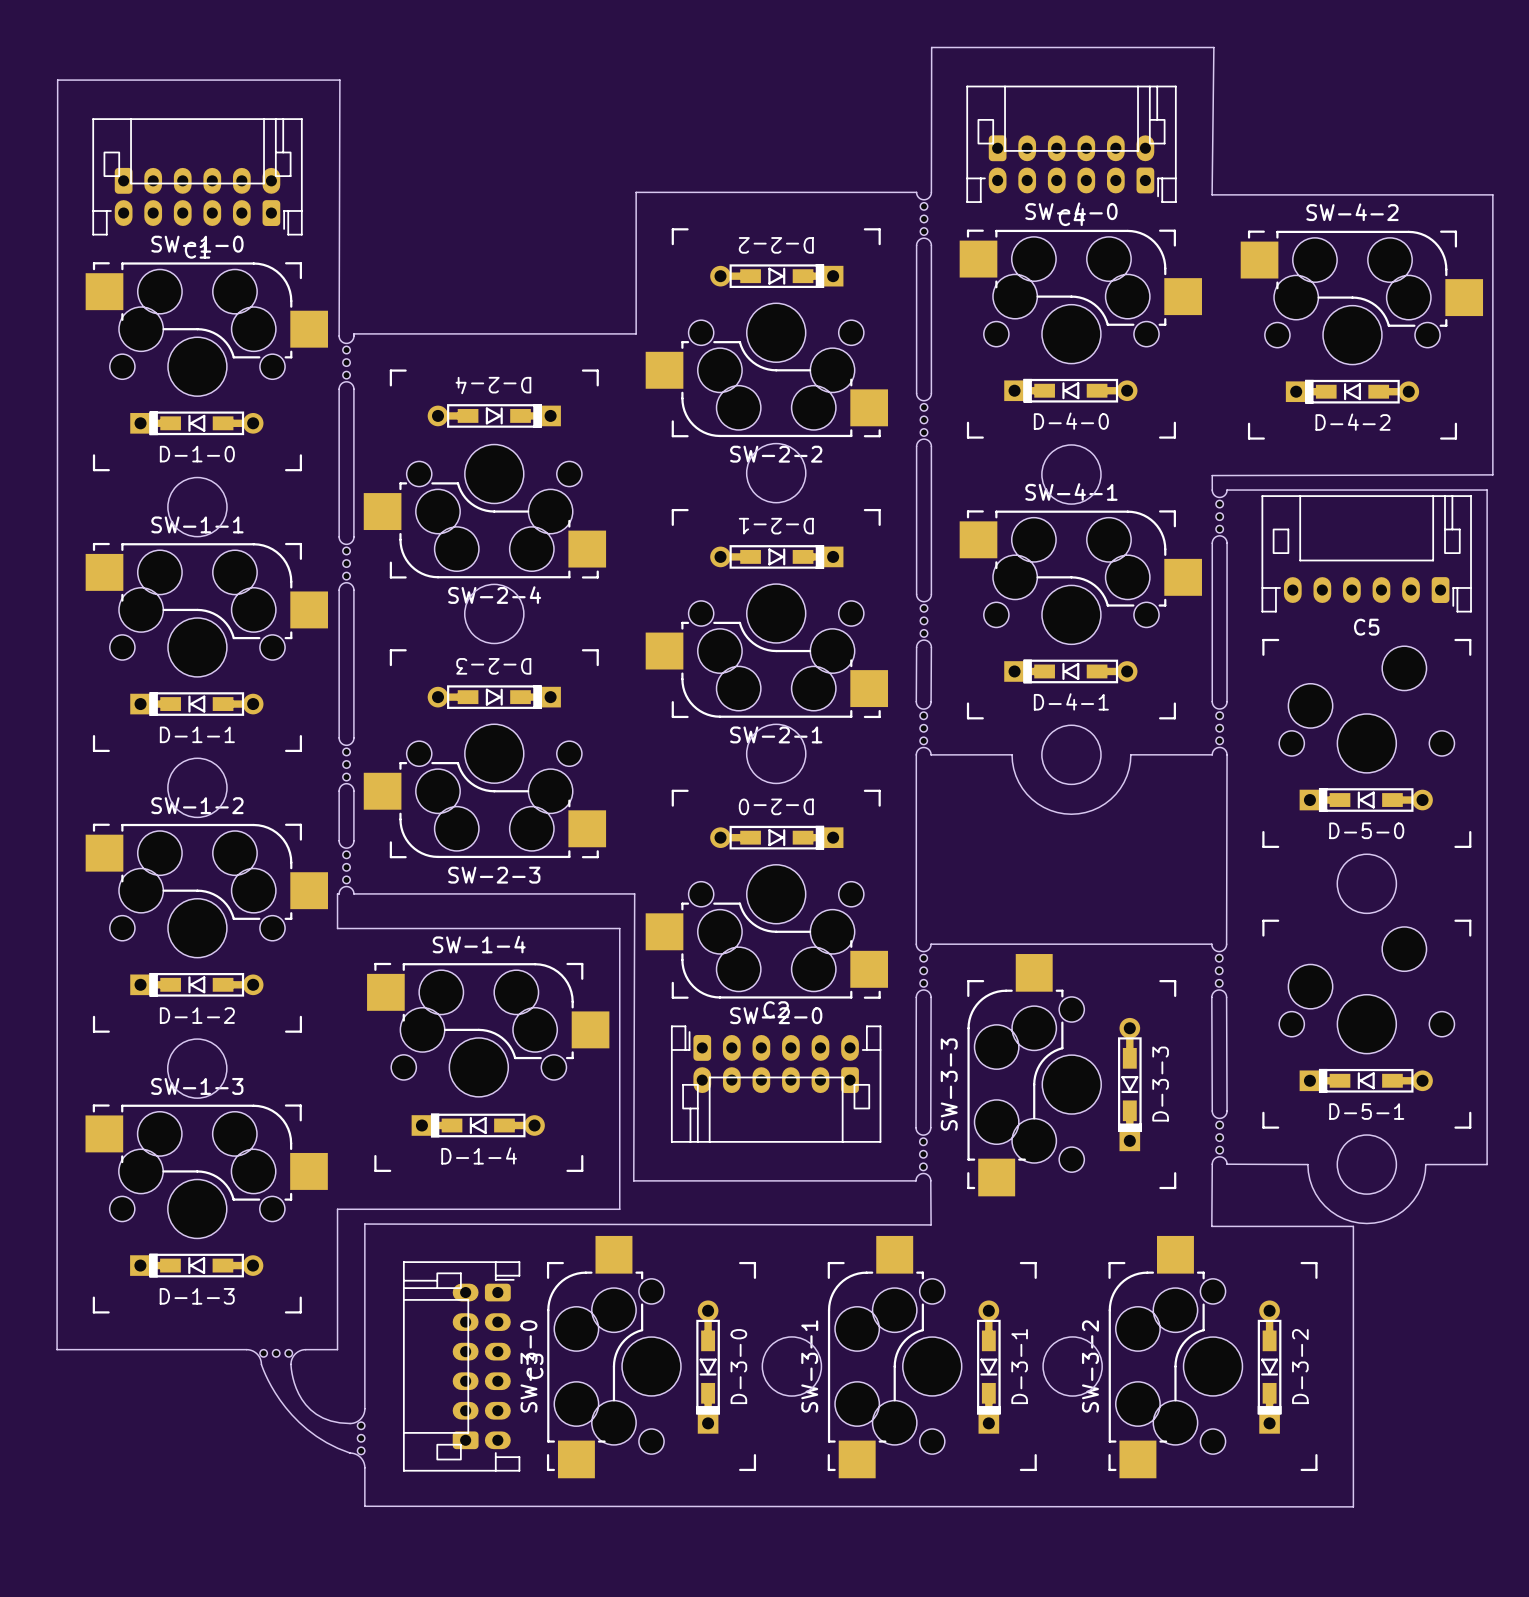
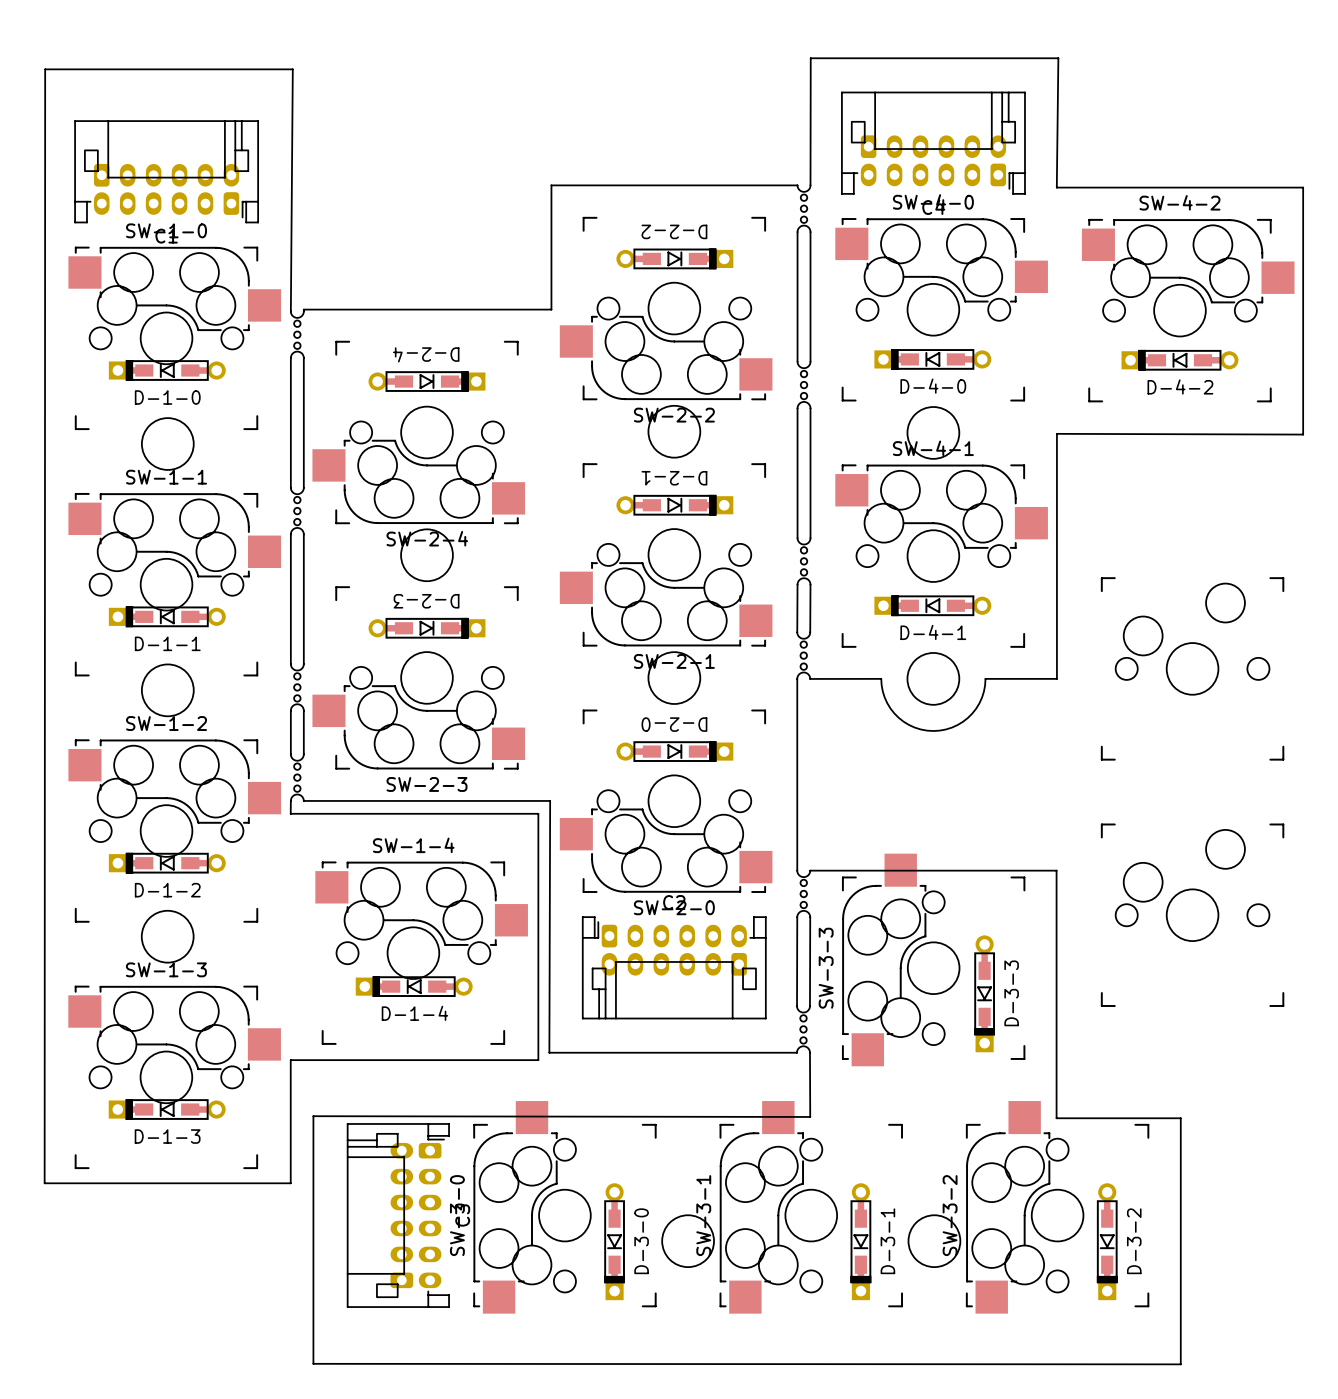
board edge: (339, 336) (339, 80) (57, 80) (57, 1349) (246, 1349) -> (290, 311) (292, 69) (45, 69) (44, 1183) (290, 1183) (290, 1060) (538, 1060) (538, 813) (290, 813) (290, 800)
D-1-0 position: (196, 423) -> (167, 370)
board edge: (1492, 474) (1212, 475) (1212, 492) (1219, 497) (1225, 494) (1227, 490) (1487, 490) (1487, 1164) (1425, 1164) (1421, 1187) (1408, 1206) (1389, 1219) (1366, 1223) (1344, 1219) (1325, 1206) (1312, 1187) (1307, 1164) (1227, 1164) (1224, 1158) (1219, 1156) (1214, 1158) (1212, 1163) (1211, 1226) (1353, 1226) (1353, 1255) -> (1303, 433) (1056, 433) (1056, 678)
drawing position: (197, 507) -> (167, 444)
part: (1219, 516) -> none
board edge: (1212, 543) (1212, 701) (1214, 706) (1219, 709) (1224, 706) (1227, 701) (1227, 543) (1224, 538) (1219, 535) (1214, 538) (1212, 543) -> none
C5: (1366, 553) -> none
D-1-1 position: (196, 704) -> (167, 616)
part: (1219, 728) -> none
board edge: (1212, 754) (1214, 749) (1219, 747) (1225, 749) (1227, 754) (1226, 944) (1223, 950) (1215, 950) (1211, 944) (931, 944) (928, 949) (923, 951) (918, 949) (916, 944) -> (1056, 1118) (1056, 870) (810, 870) (808, 875) (802, 877) (797, 871) (797, 845)
drawing position: (197, 787) -> (167, 690)
D-5-0: (1366, 800) -> none
drawing: [1336, 853, 1397, 914] -> none
board edge: (339, 893) (337, 893) (337, 928) (619, 928) (619, 1209) (337, 1209) (337, 1349) (305, 1349) -> none
part position: (923, 970) -> (803, 893)
part: (1219, 970) -> none
D-1-2 position: (196, 984) -> (167, 863)
board edge: (1211, 997) (1212, 1111) (1215, 1117) (1220, 1118) (1225, 1115) (1227, 1111) (1226, 996) (1223, 991) (1218, 990) (1213, 992) (1211, 997) -> none
drawing position: (197, 1068) -> (167, 936)
D-5-1: (1366, 1080) -> none
D-3-3 position: (1129, 1084) -> (984, 993)
D-1-4 position: (478, 1125) -> (414, 986)
board edge: (916, 1127) (916, 997) (918, 991) (923, 989) (928, 991) (931, 997) (930, 1127) -> (797, 1006) (797, 916) (799, 912) (803, 910) (808, 912) (810, 916) (809, 1006)
drawing: [1336, 1134, 1397, 1195] -> none
part: (1219, 1137) -> none
board edge: (930, 1180) (931, 1224) (364, 1224) (364, 1253) -> (809, 1052) (810, 1116) (313, 1116)
board edge: none -> (1056, 1118) (1180, 1118)
D-1-3 position: (196, 1265) -> (167, 1109)
part: (276, 1357) -> none
board edge: (261, 1364) (275, 1393) (299, 1422) (326, 1442) (350, 1453) -> none
board edge: (290, 1364) (296, 1388) (310, 1409) (330, 1420) (350, 1423) -> none
drawing position: (791, 1366) -> (688, 1241)
drawing position: (1072, 1366) -> (934, 1241)
D-3-0 position: (708, 1367) -> (614, 1241)
D-3-1 position: (988, 1367) -> (860, 1241)
D-3-2 position: (1269, 1367) -> (1107, 1241)
board edge: none -> (313, 1252) (313, 1304)
part: (357, 1438) -> none
board edge: (364, 1506) (1353, 1506) -> (313, 1338) (313, 1363) (1180, 1364) (1180, 1338)

